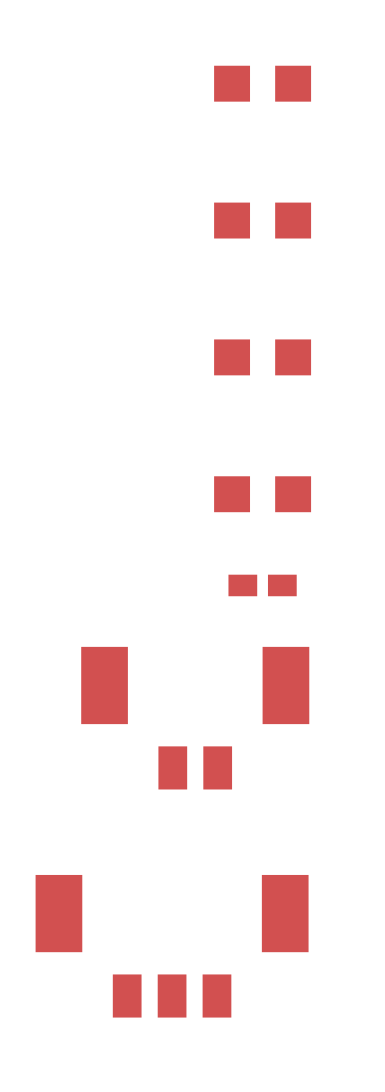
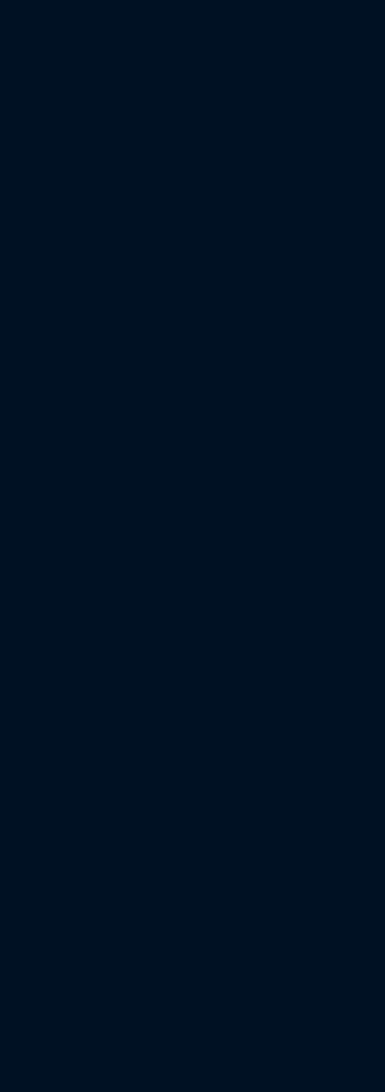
part: (262, 83) -> none
part: (262, 220) -> none
part: (262, 357) -> none
part: (262, 494) -> none
part: (262, 585) -> none
part: (195, 718) -> none
part: (172, 946) -> none

